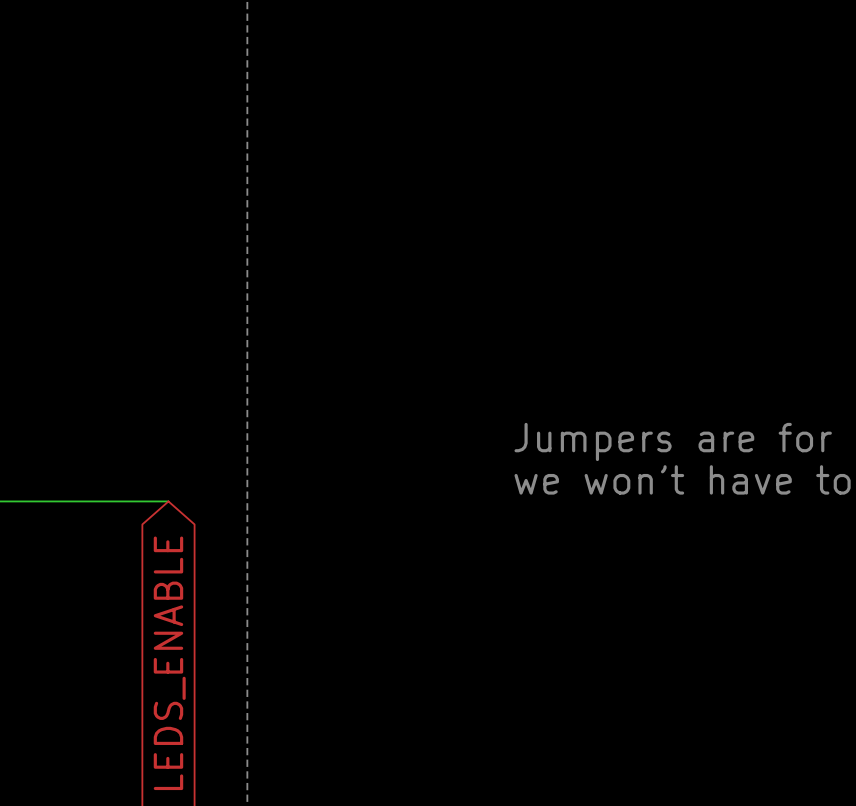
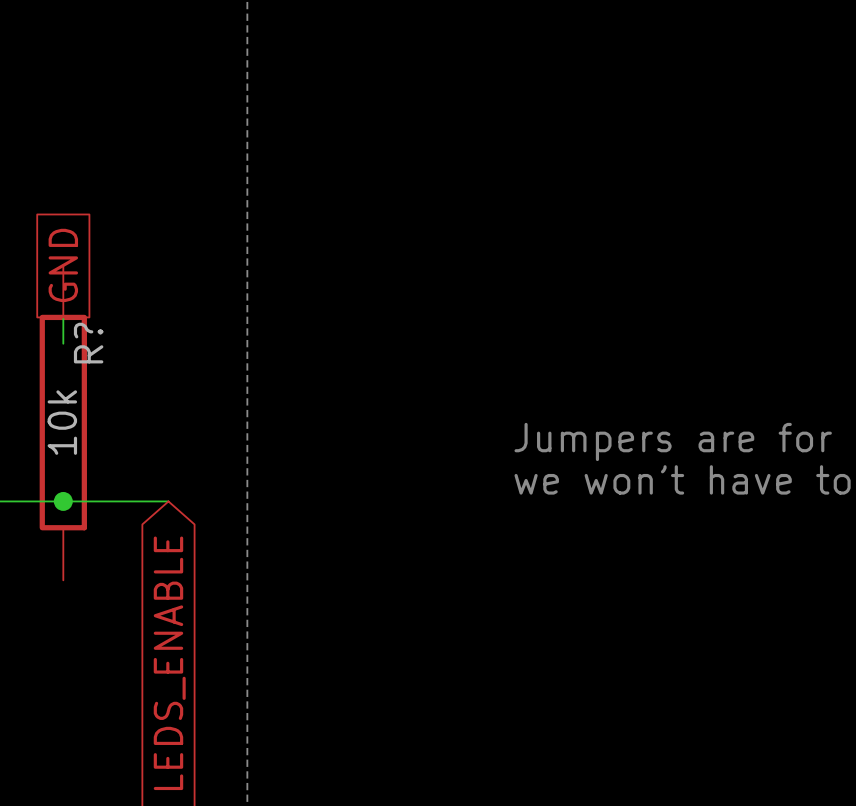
global label: none -> GND (63, 265)
wire: none -> (63, 317) (63, 343)
R?: none -> 10k (63, 422)
junction: none -> (63, 501)

